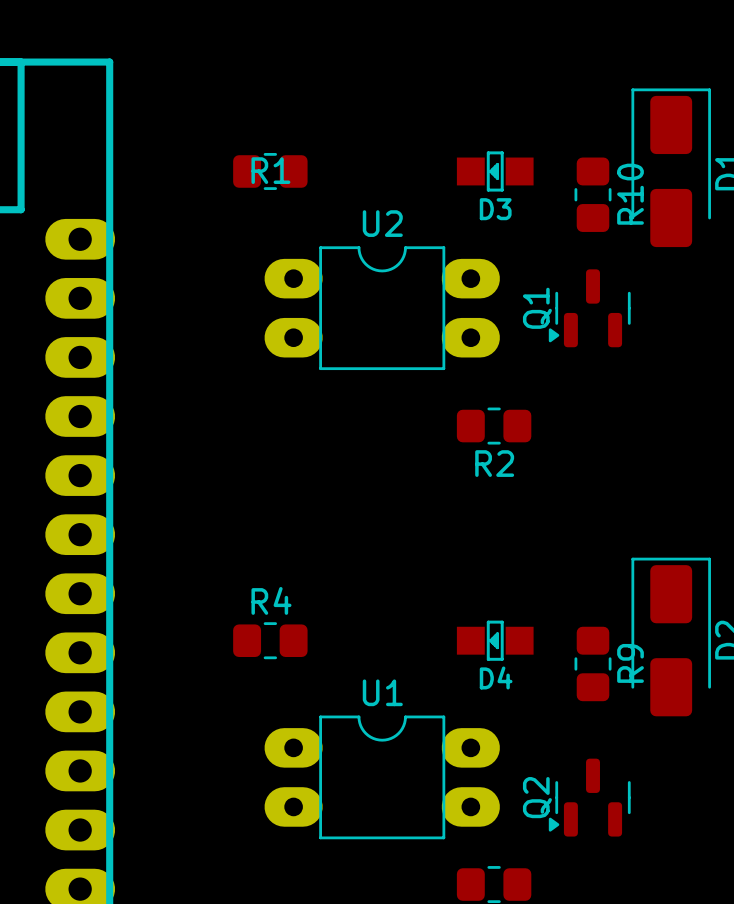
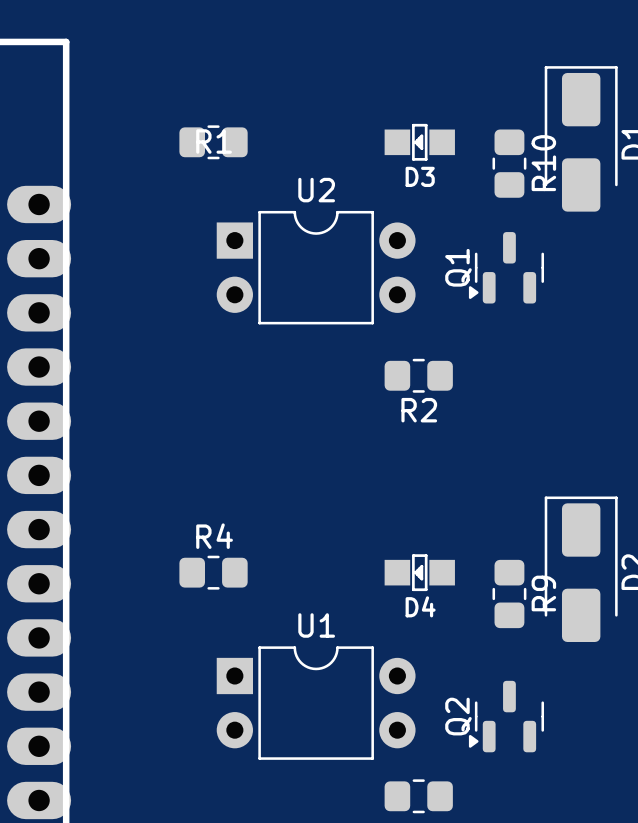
U2 footprint: [264, 246, 500, 371] -> [216, 210, 416, 325]
U1 footprint: [264, 715, 500, 840] -> [216, 646, 416, 760]

